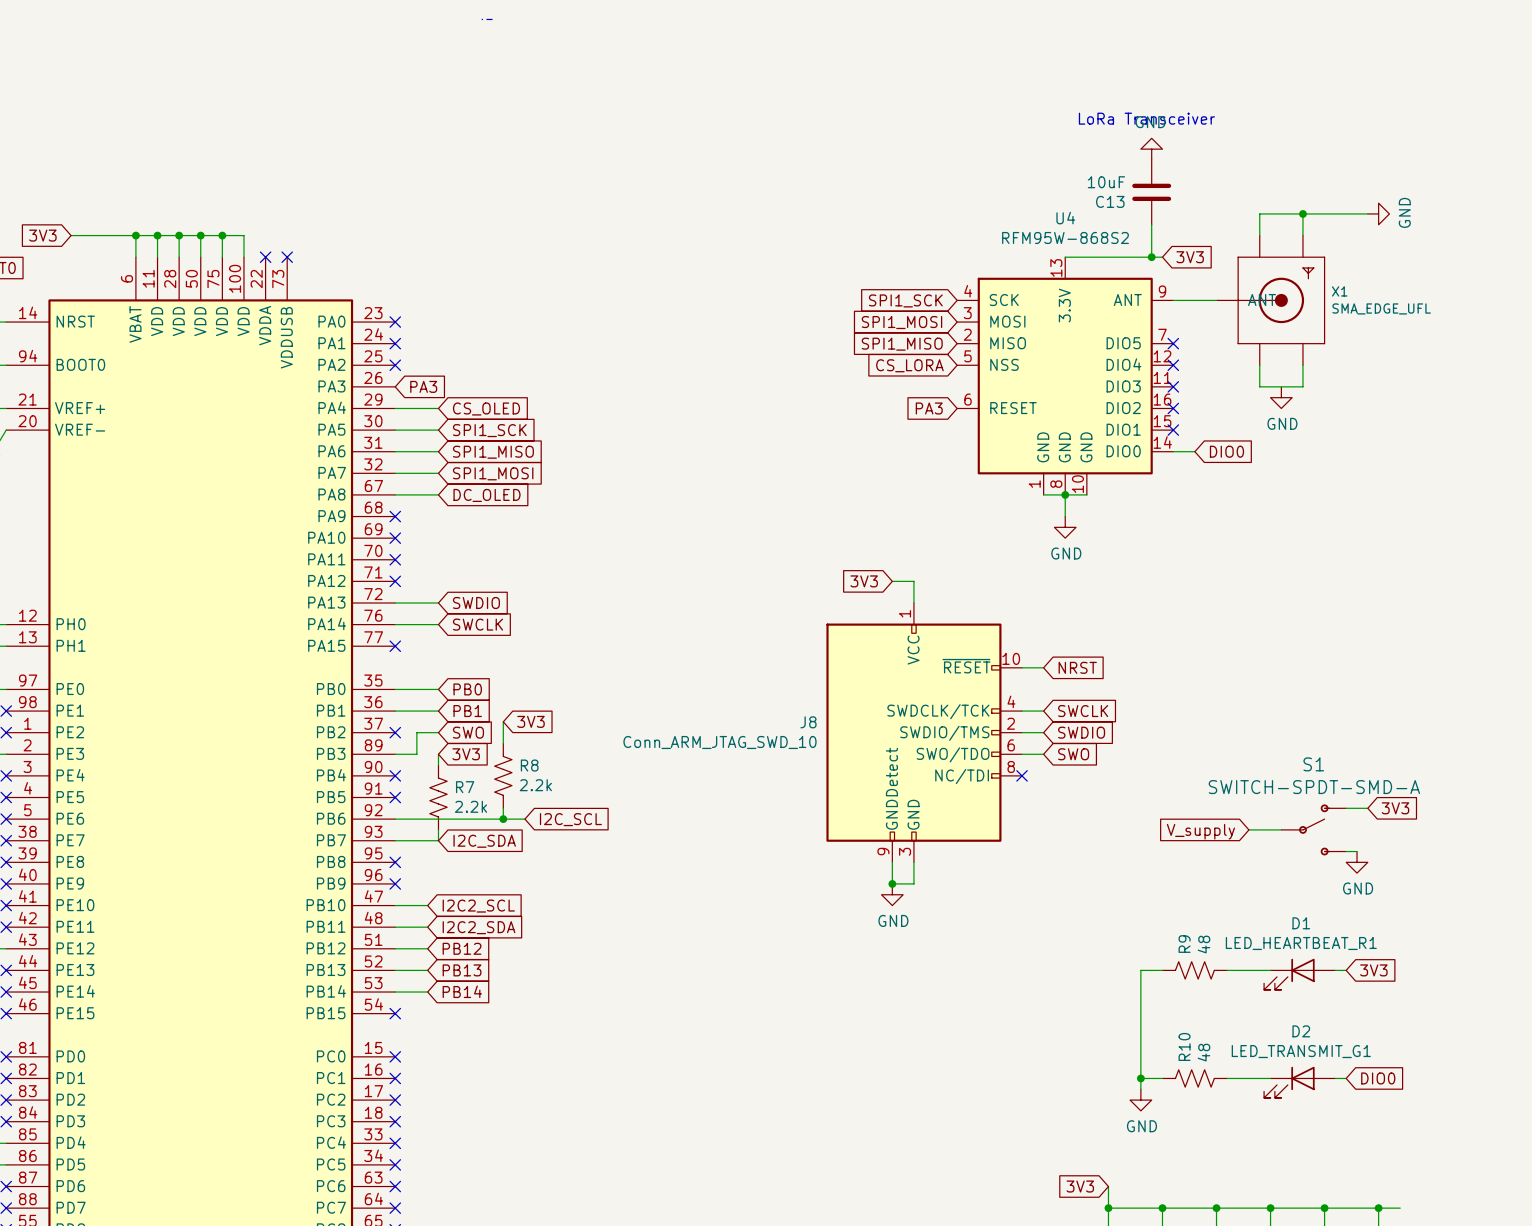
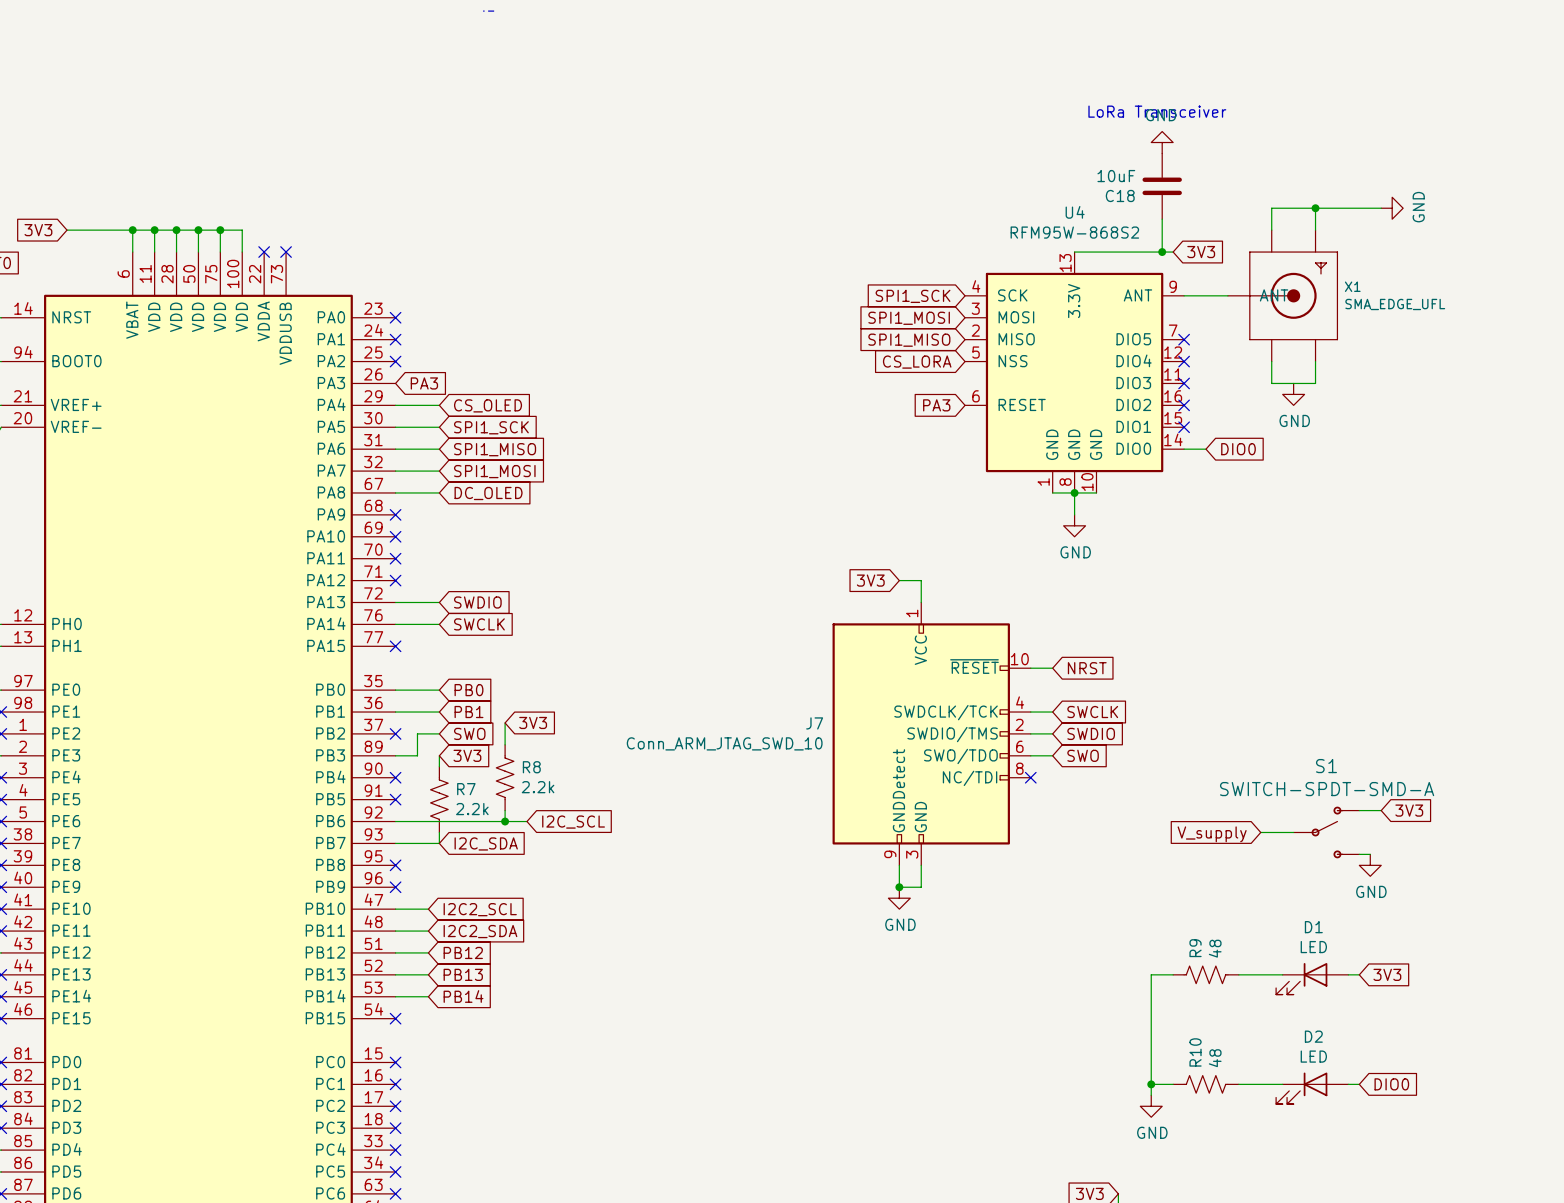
C13 name: C13 (1110, 201) -> C18 (1120, 195)
J8 name: J8 (808, 722) -> J7 (814, 723)
D1 value: LED_HEARTBEAT_R1 (1301, 943) -> LED (1313, 947)
D2 value: LED_TRANSMIT_G1 (1301, 1051) -> LED (1313, 1056)

